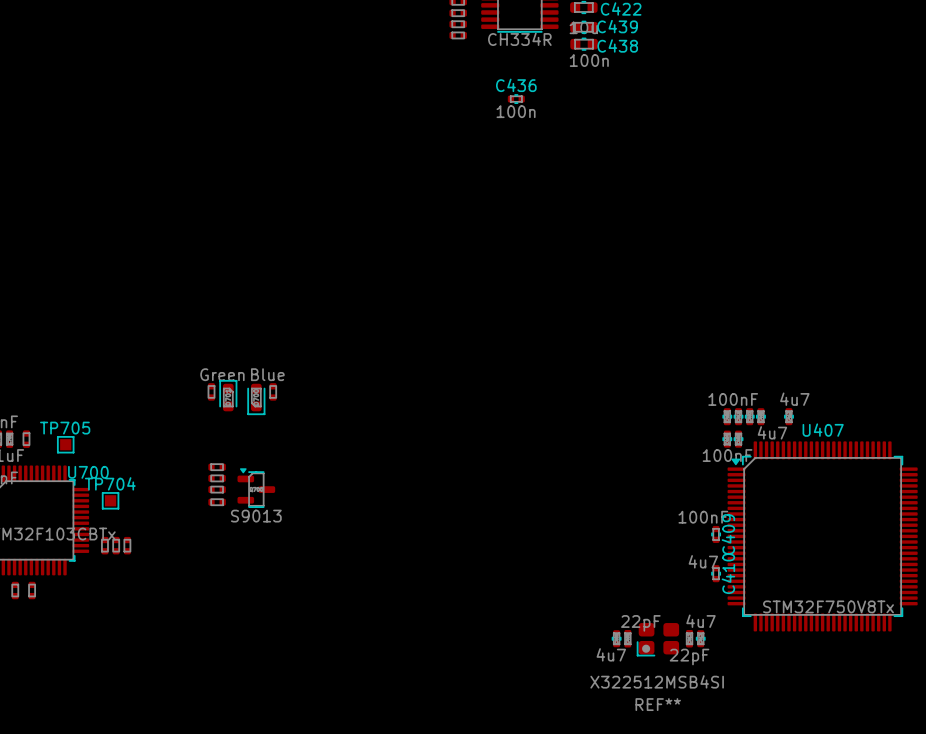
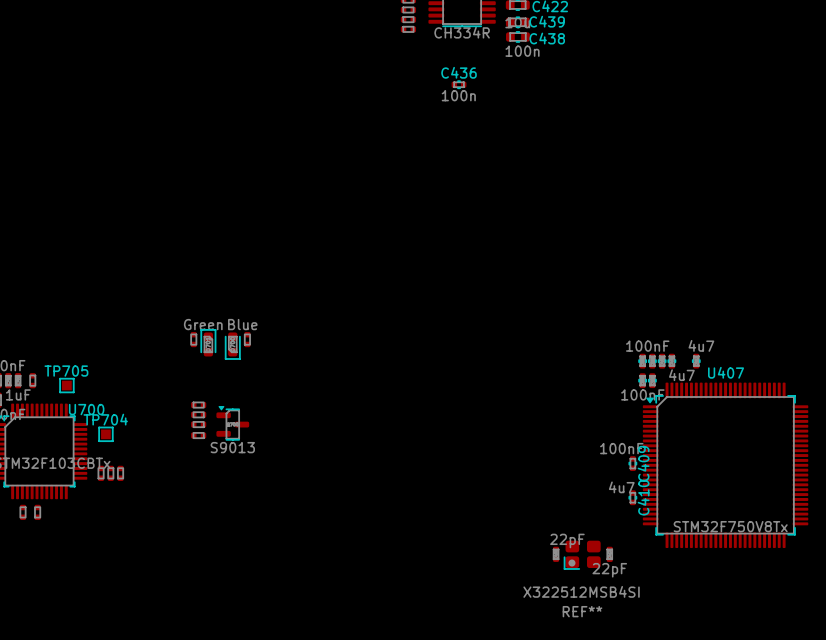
part: 4u7 (616, 638) -> none
part: 4u7 (700, 638) -> none

